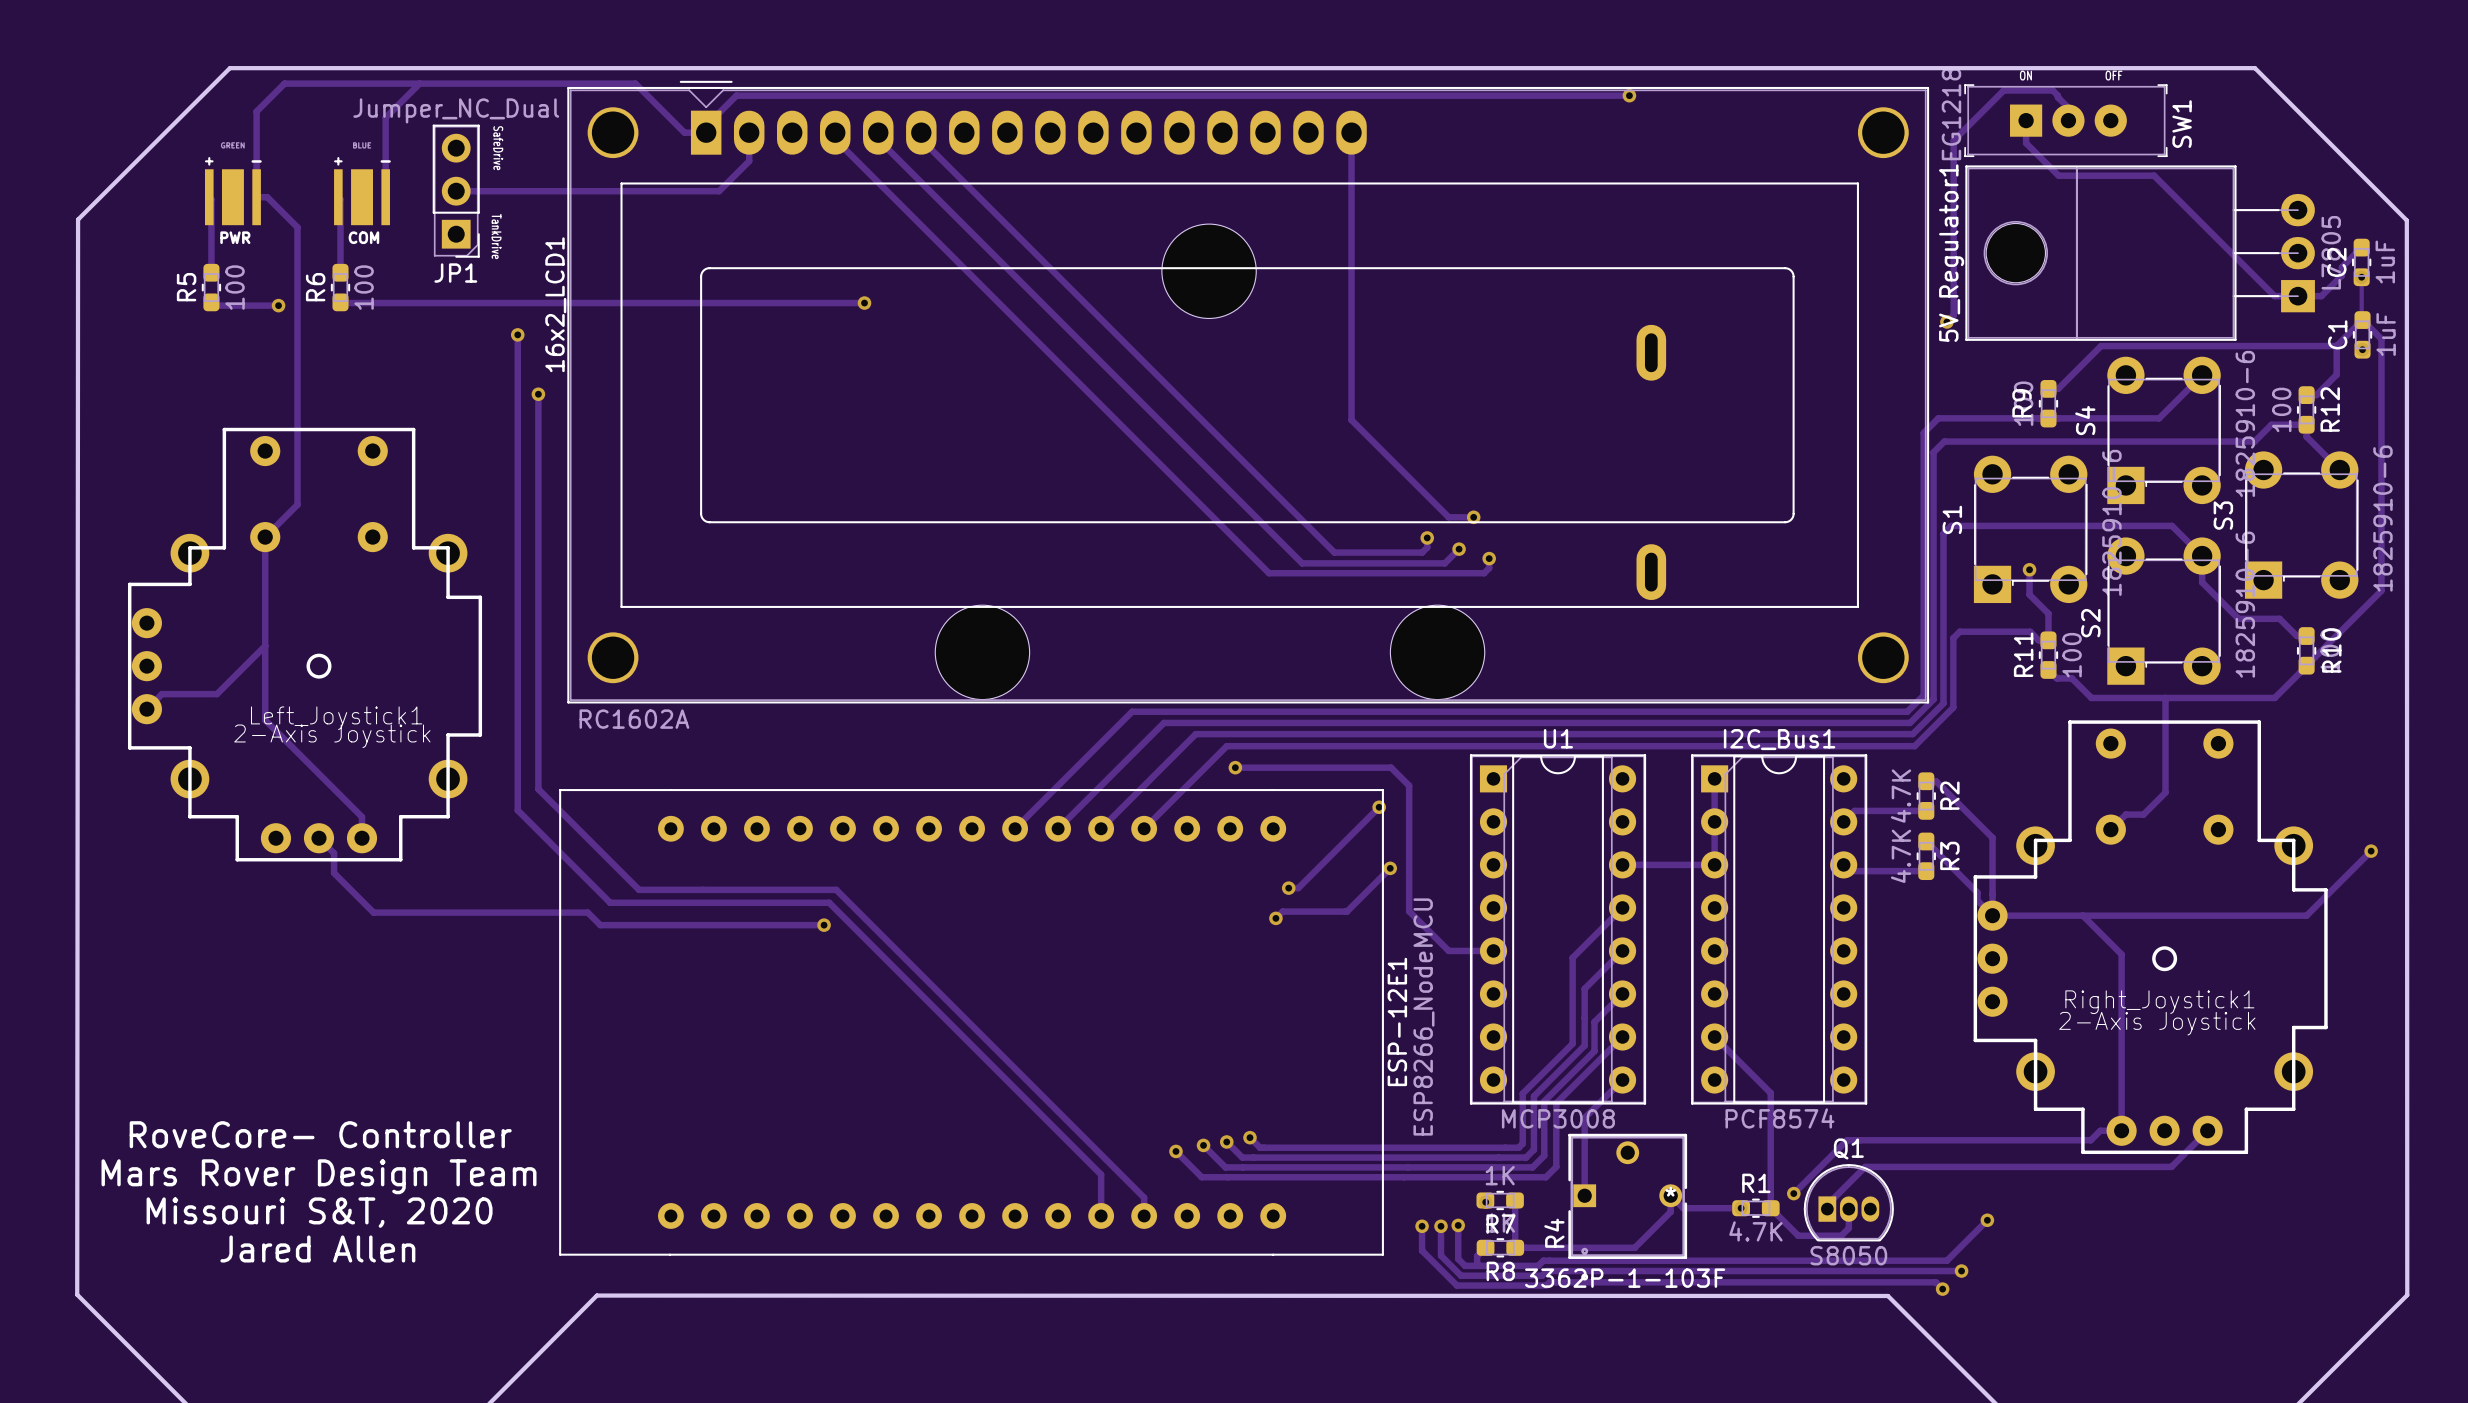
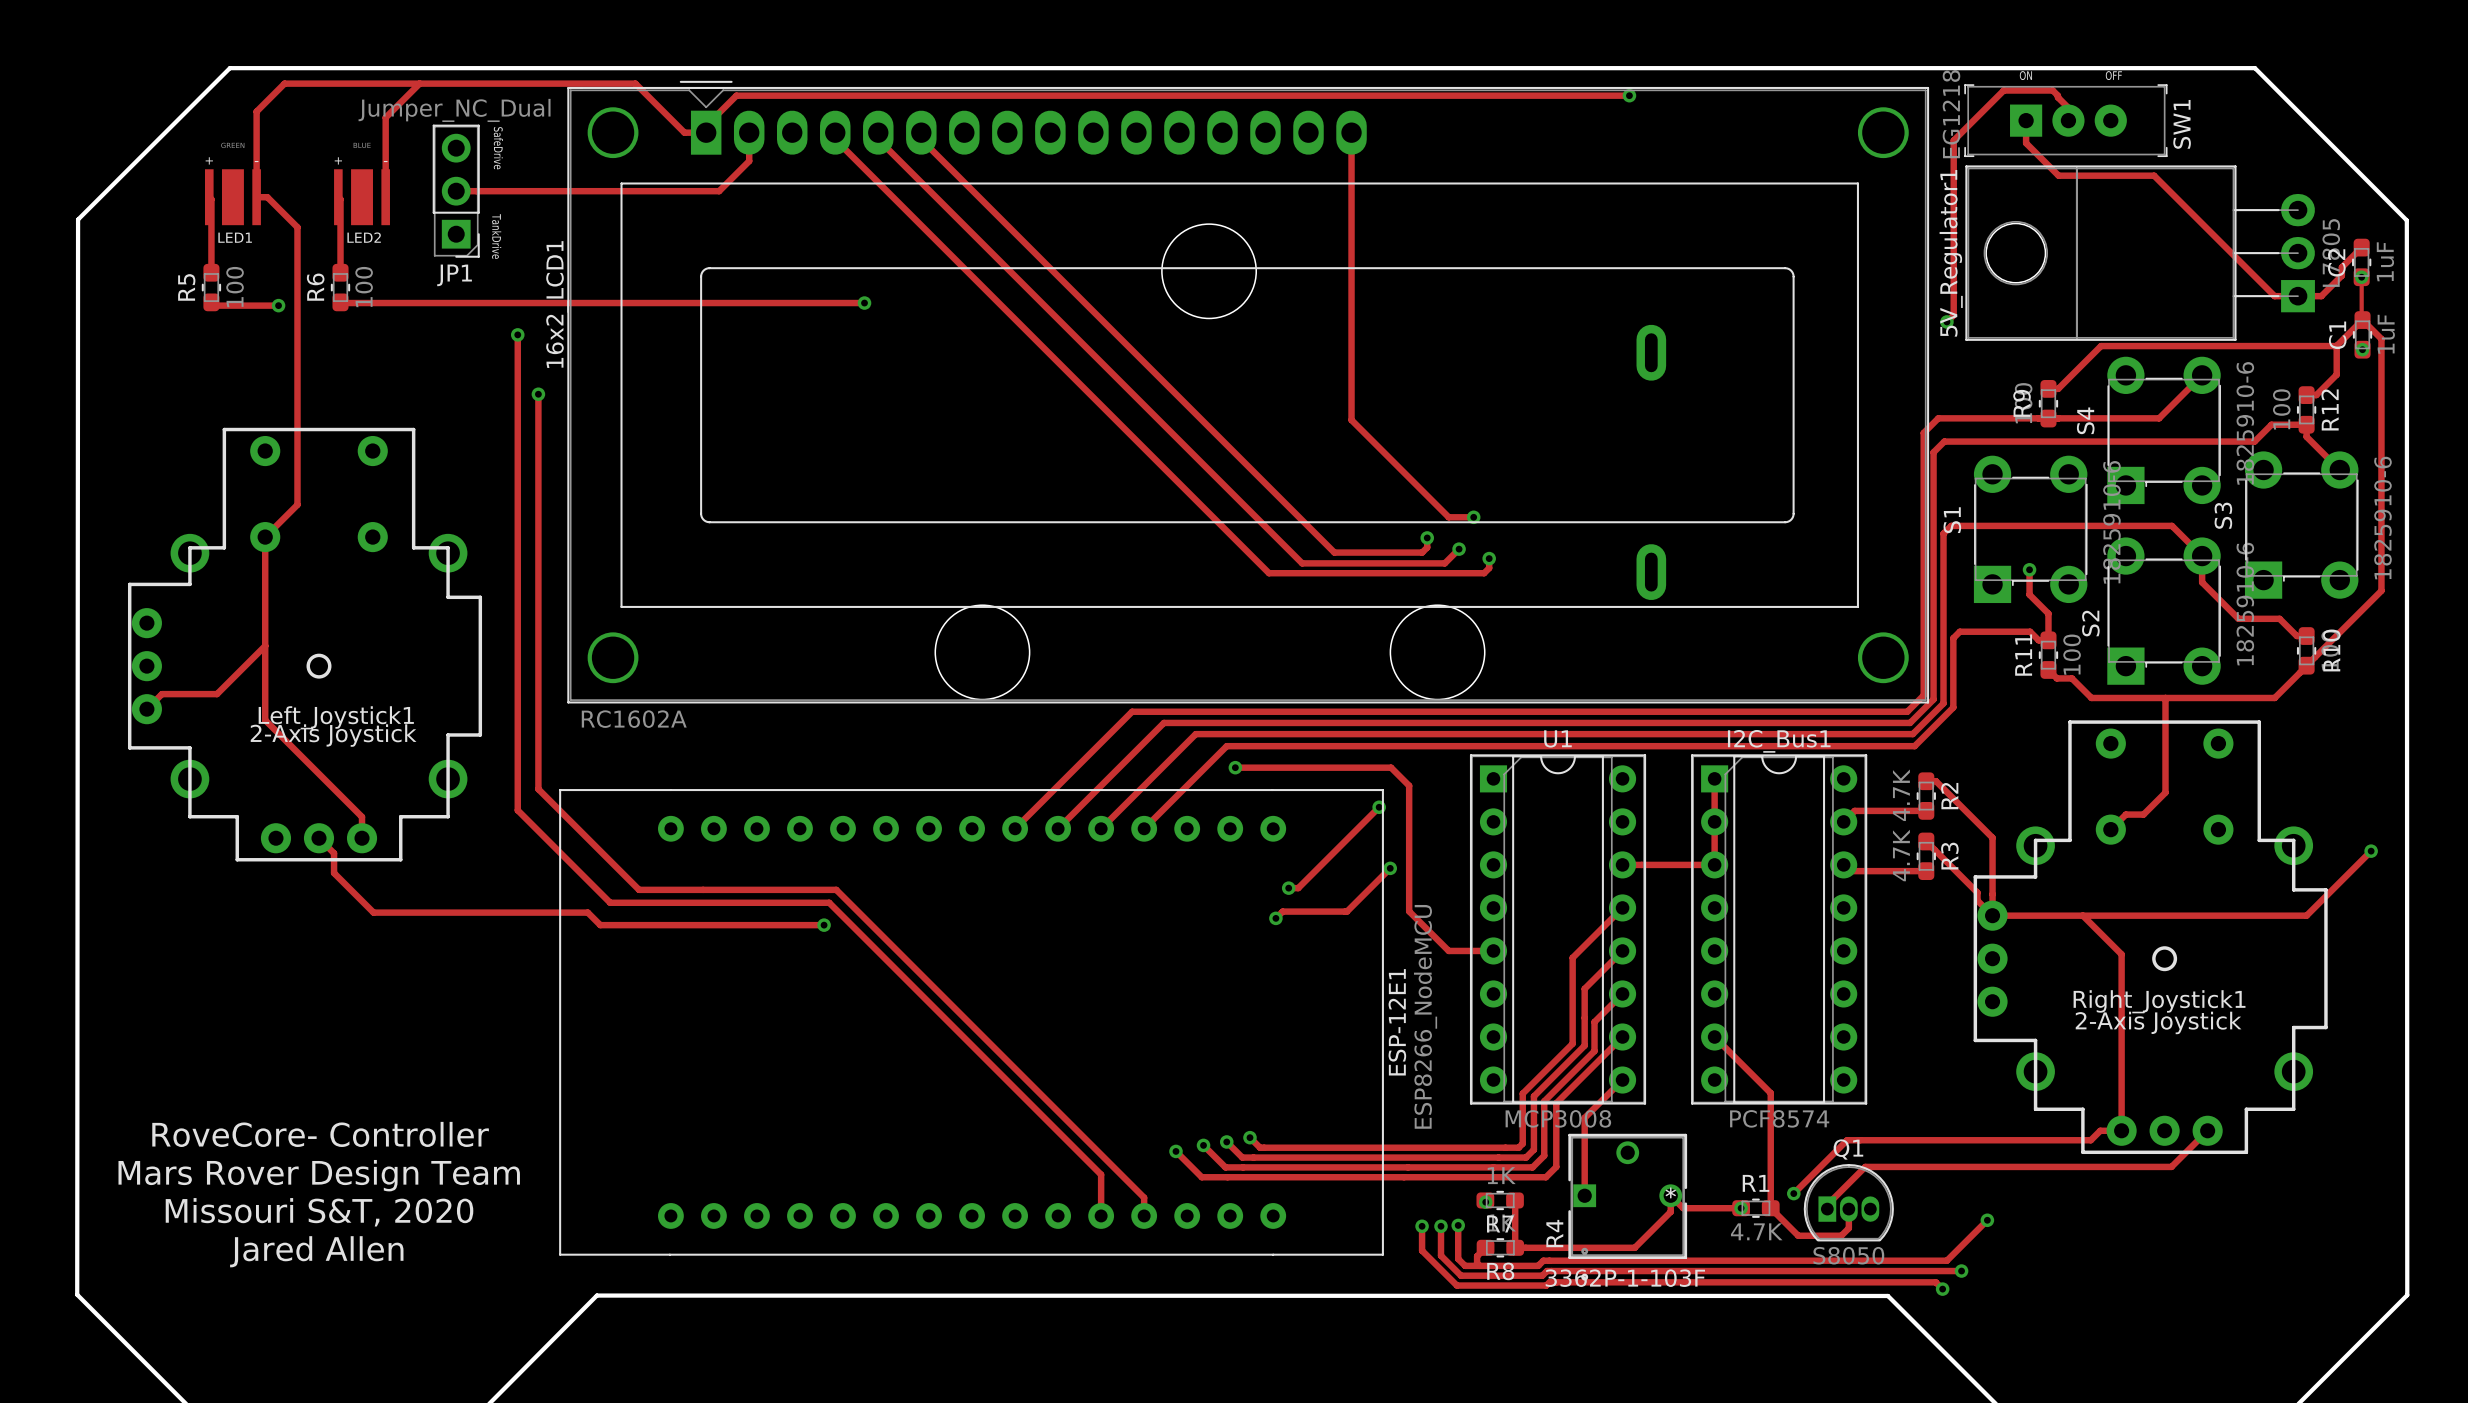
PWR name: PWR (235, 237) -> LED1 (235, 237)
COM name: COM (363, 237) -> LED2 (364, 237)

